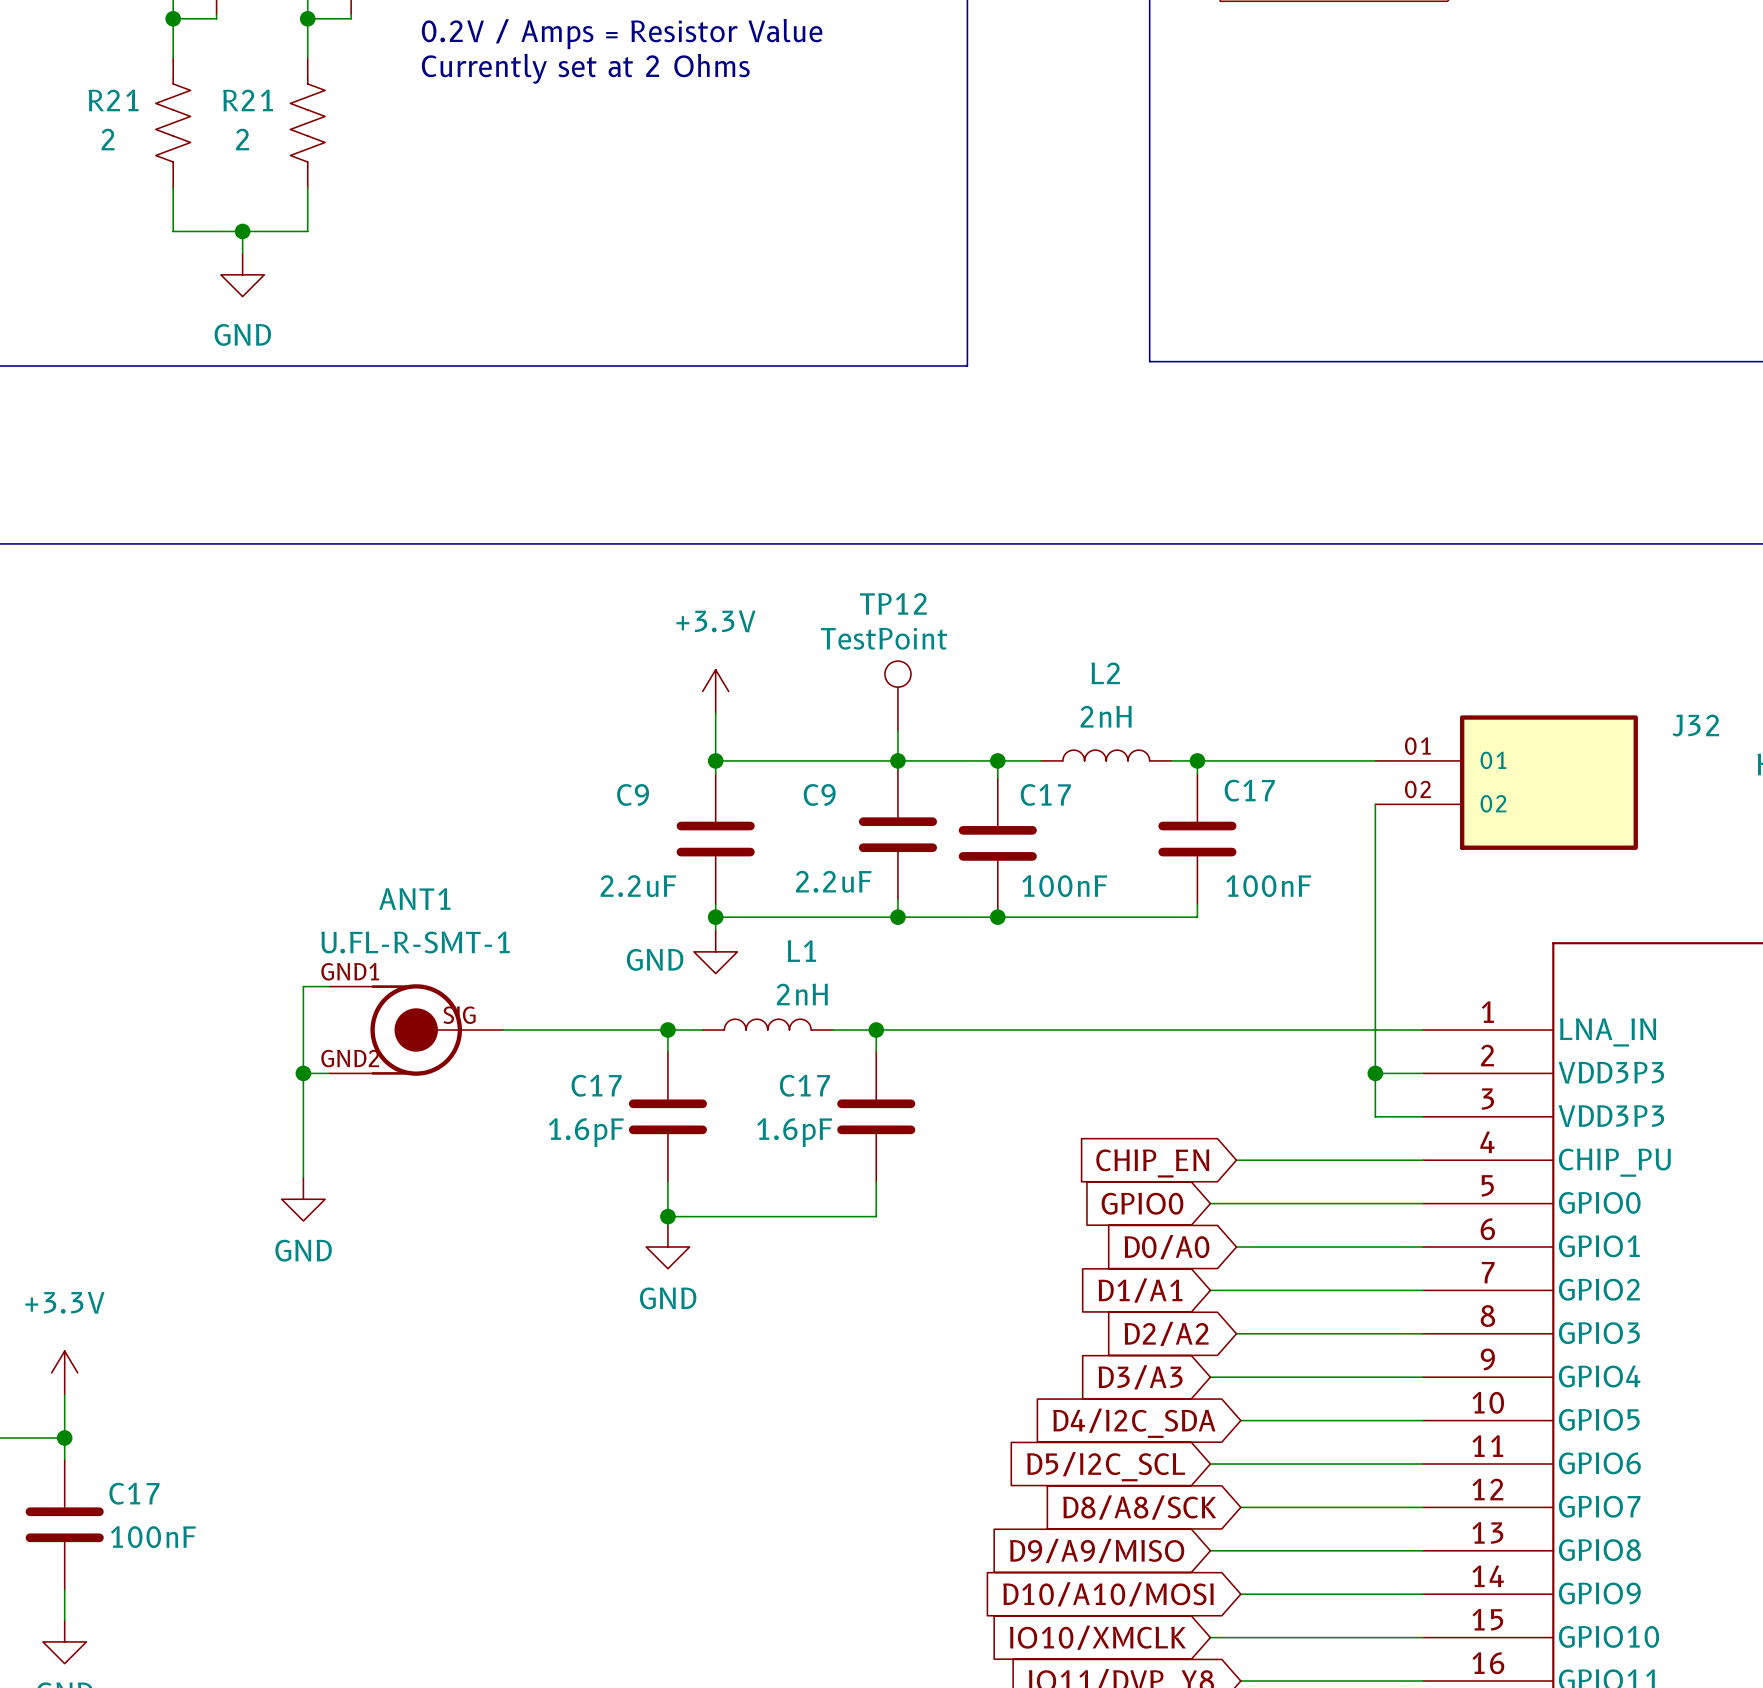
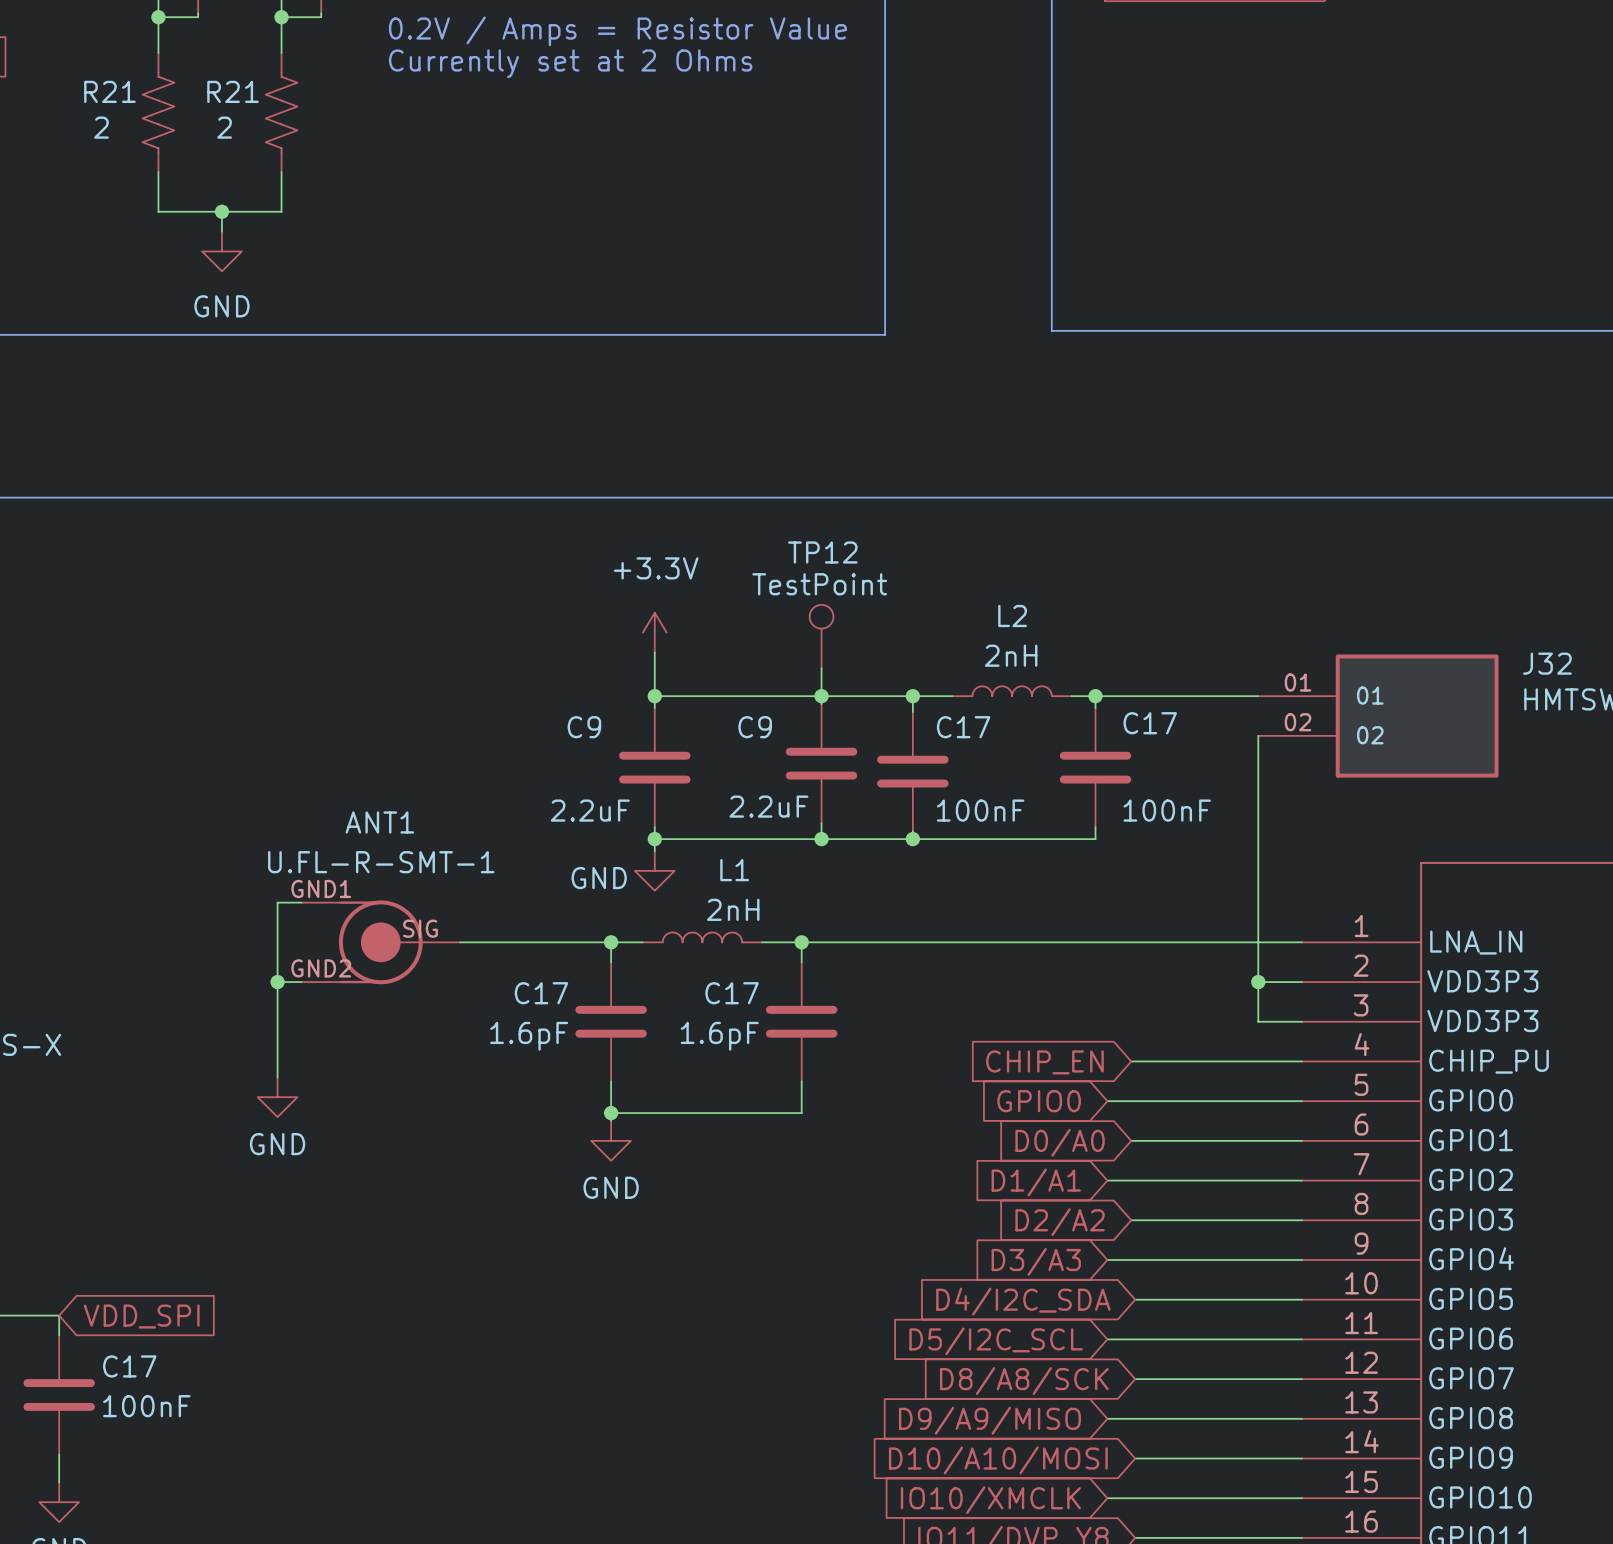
power symbol: +3.3V (64, 1372) -> none
wire: (64, 1394) (64, 1437) -> none
junction: (64, 1437) -> none
global label: none -> VDD_SPI (141, 1316)

